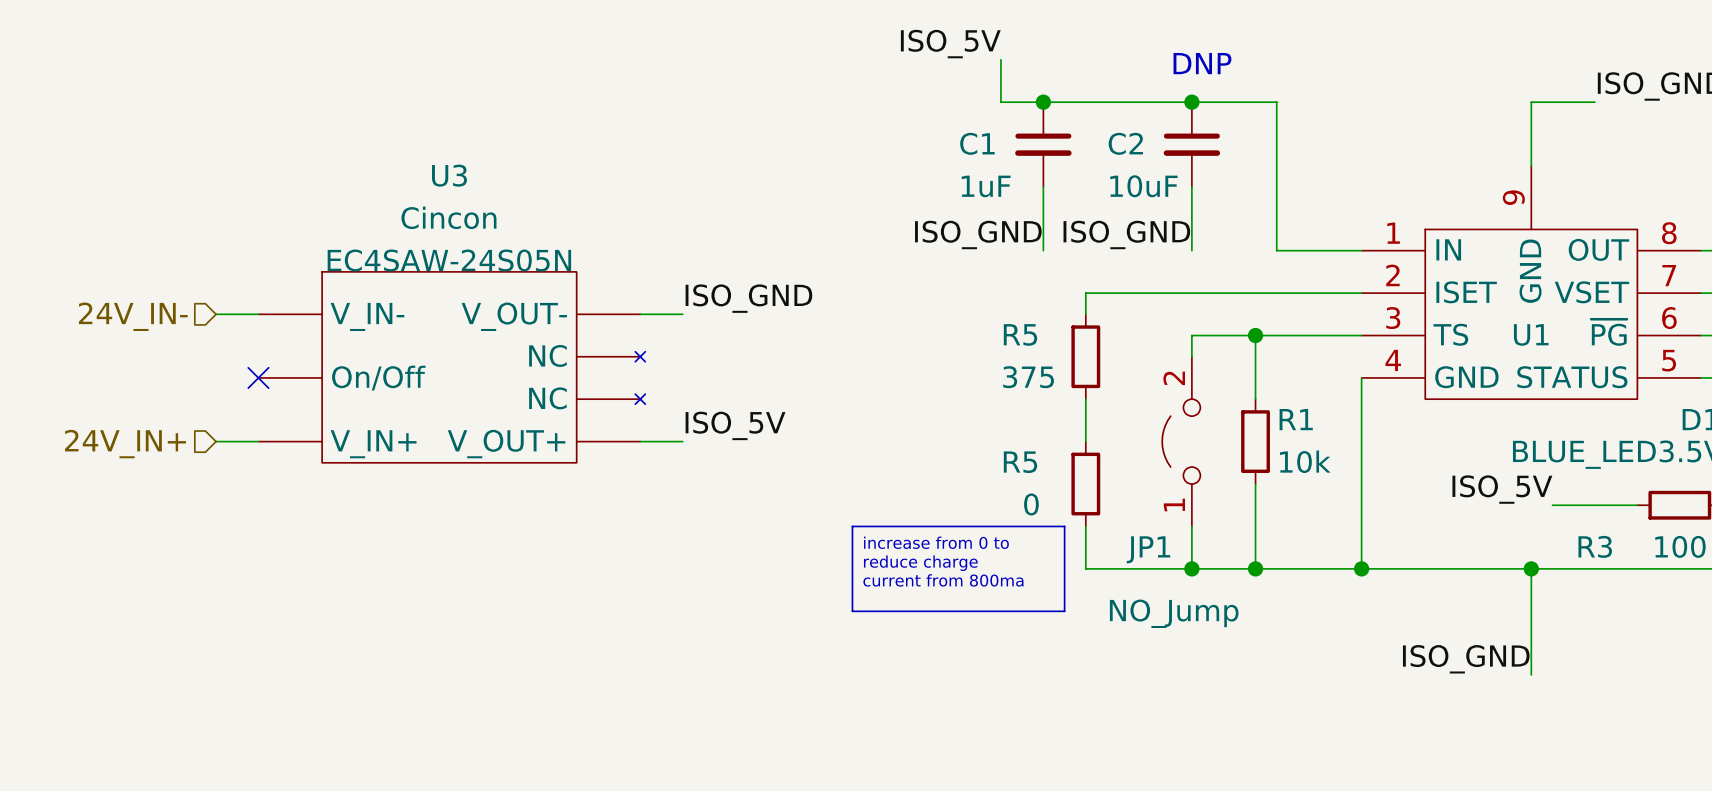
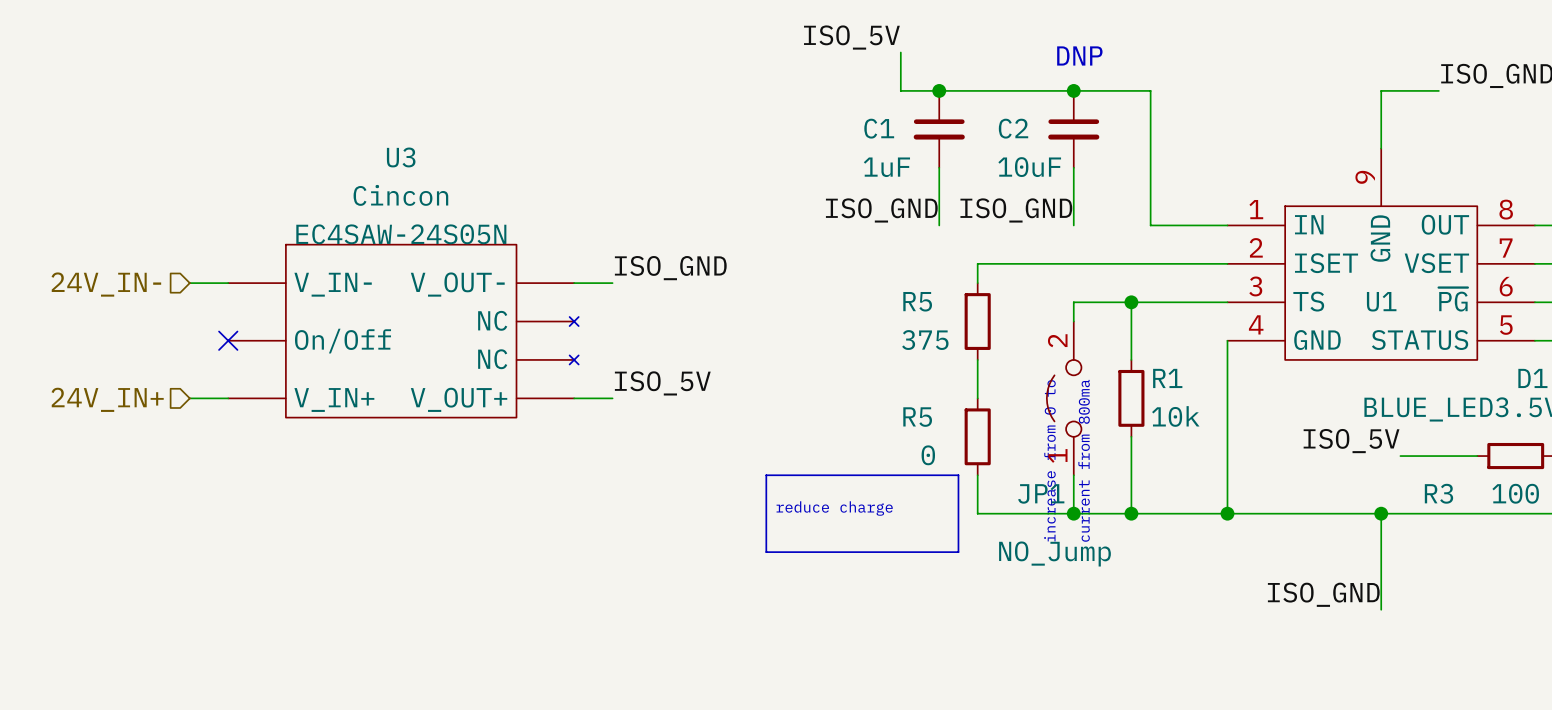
text rotation: 0° (936, 542) -> 90° counterclockwise (1049, 460)
text position: increase from 0 to (936, 542) -> increase from 0 to (1049, 460)
text rotation: 0° (943, 580) -> 90° counterclockwise (1084, 460)
text position: current from 800ma (943, 580) -> current from 800ma (1084, 460)

